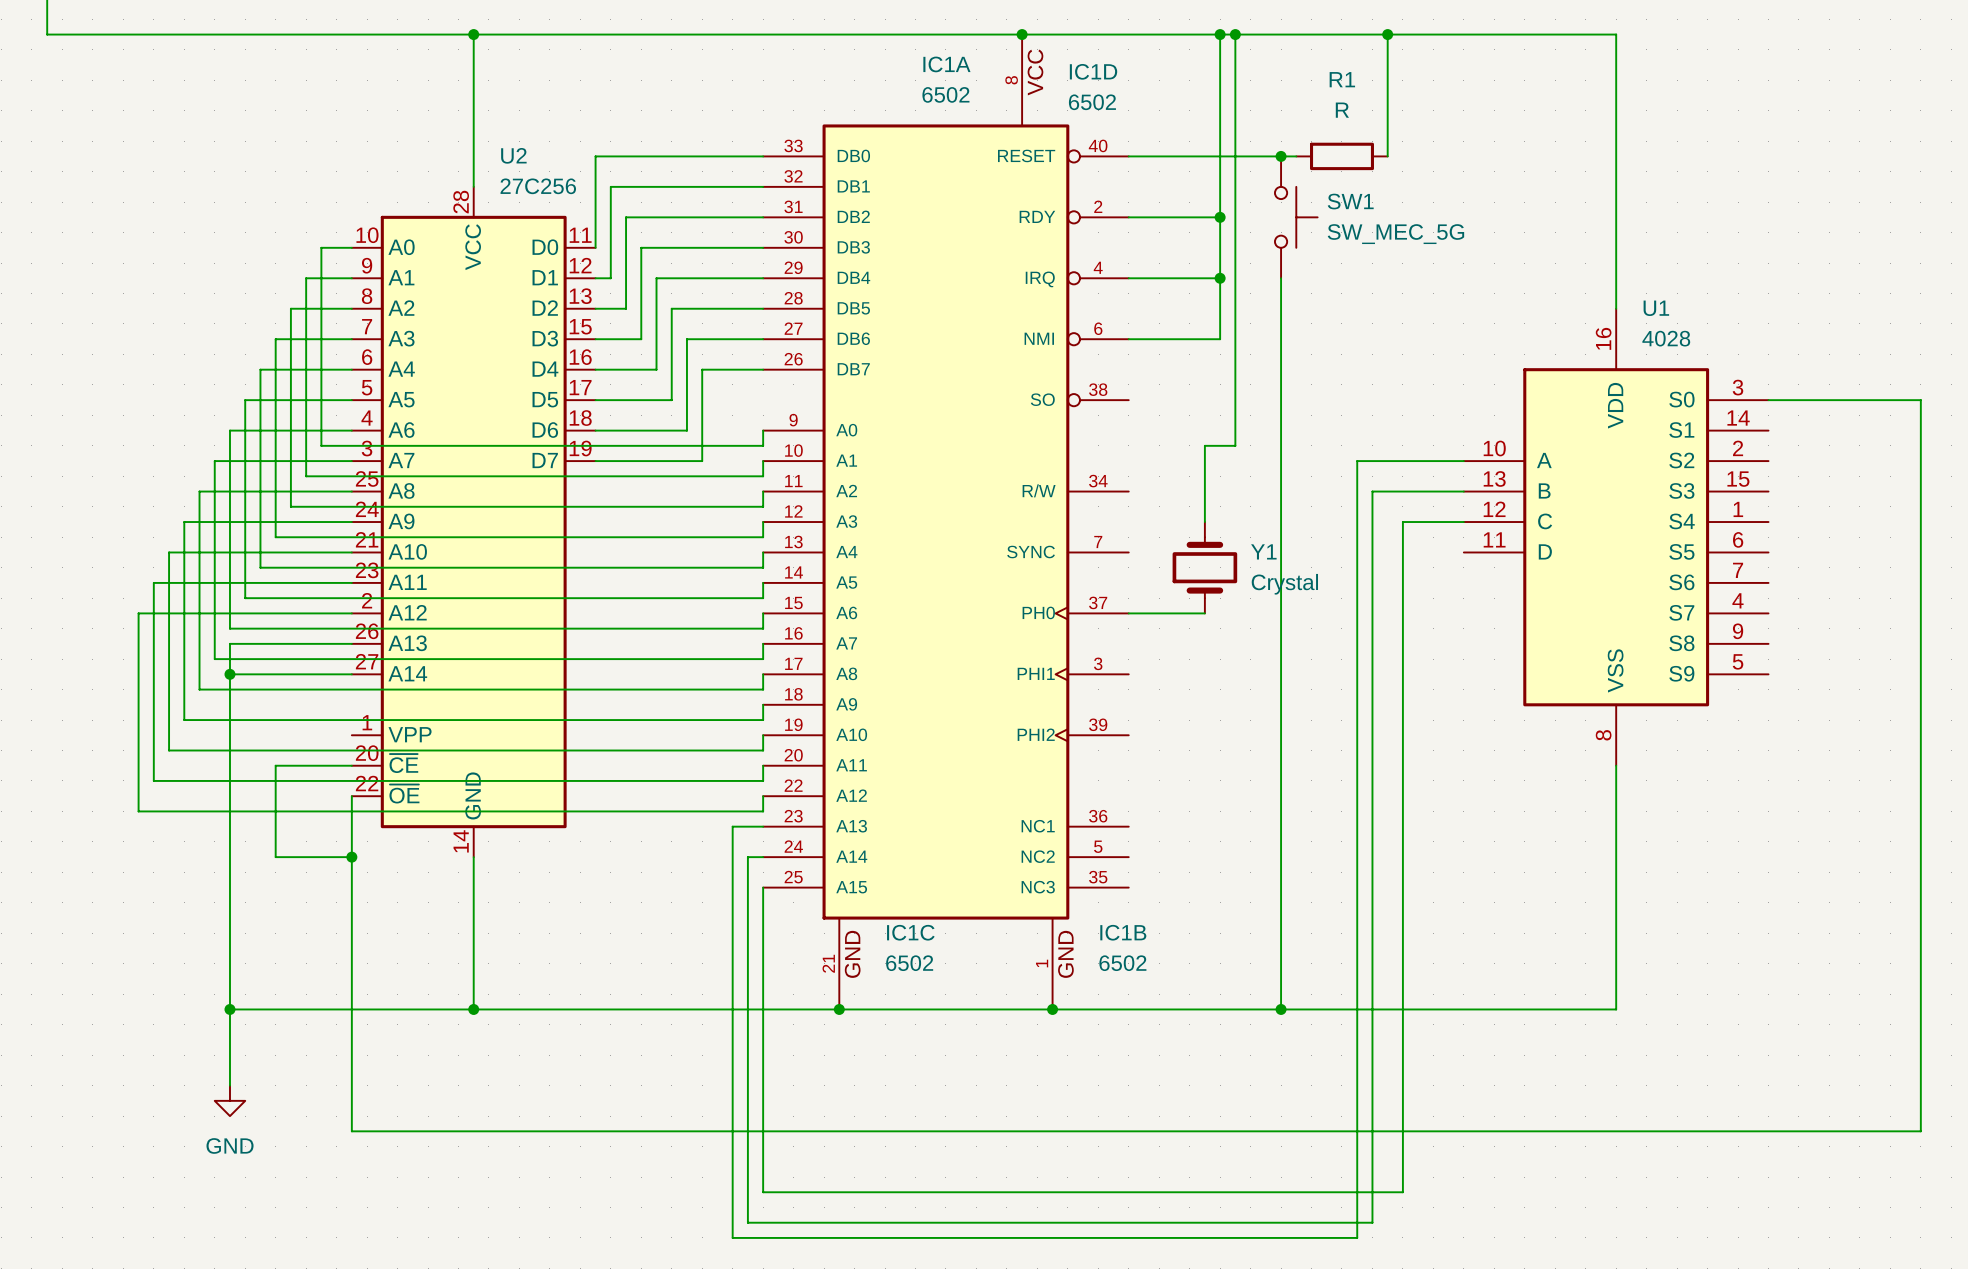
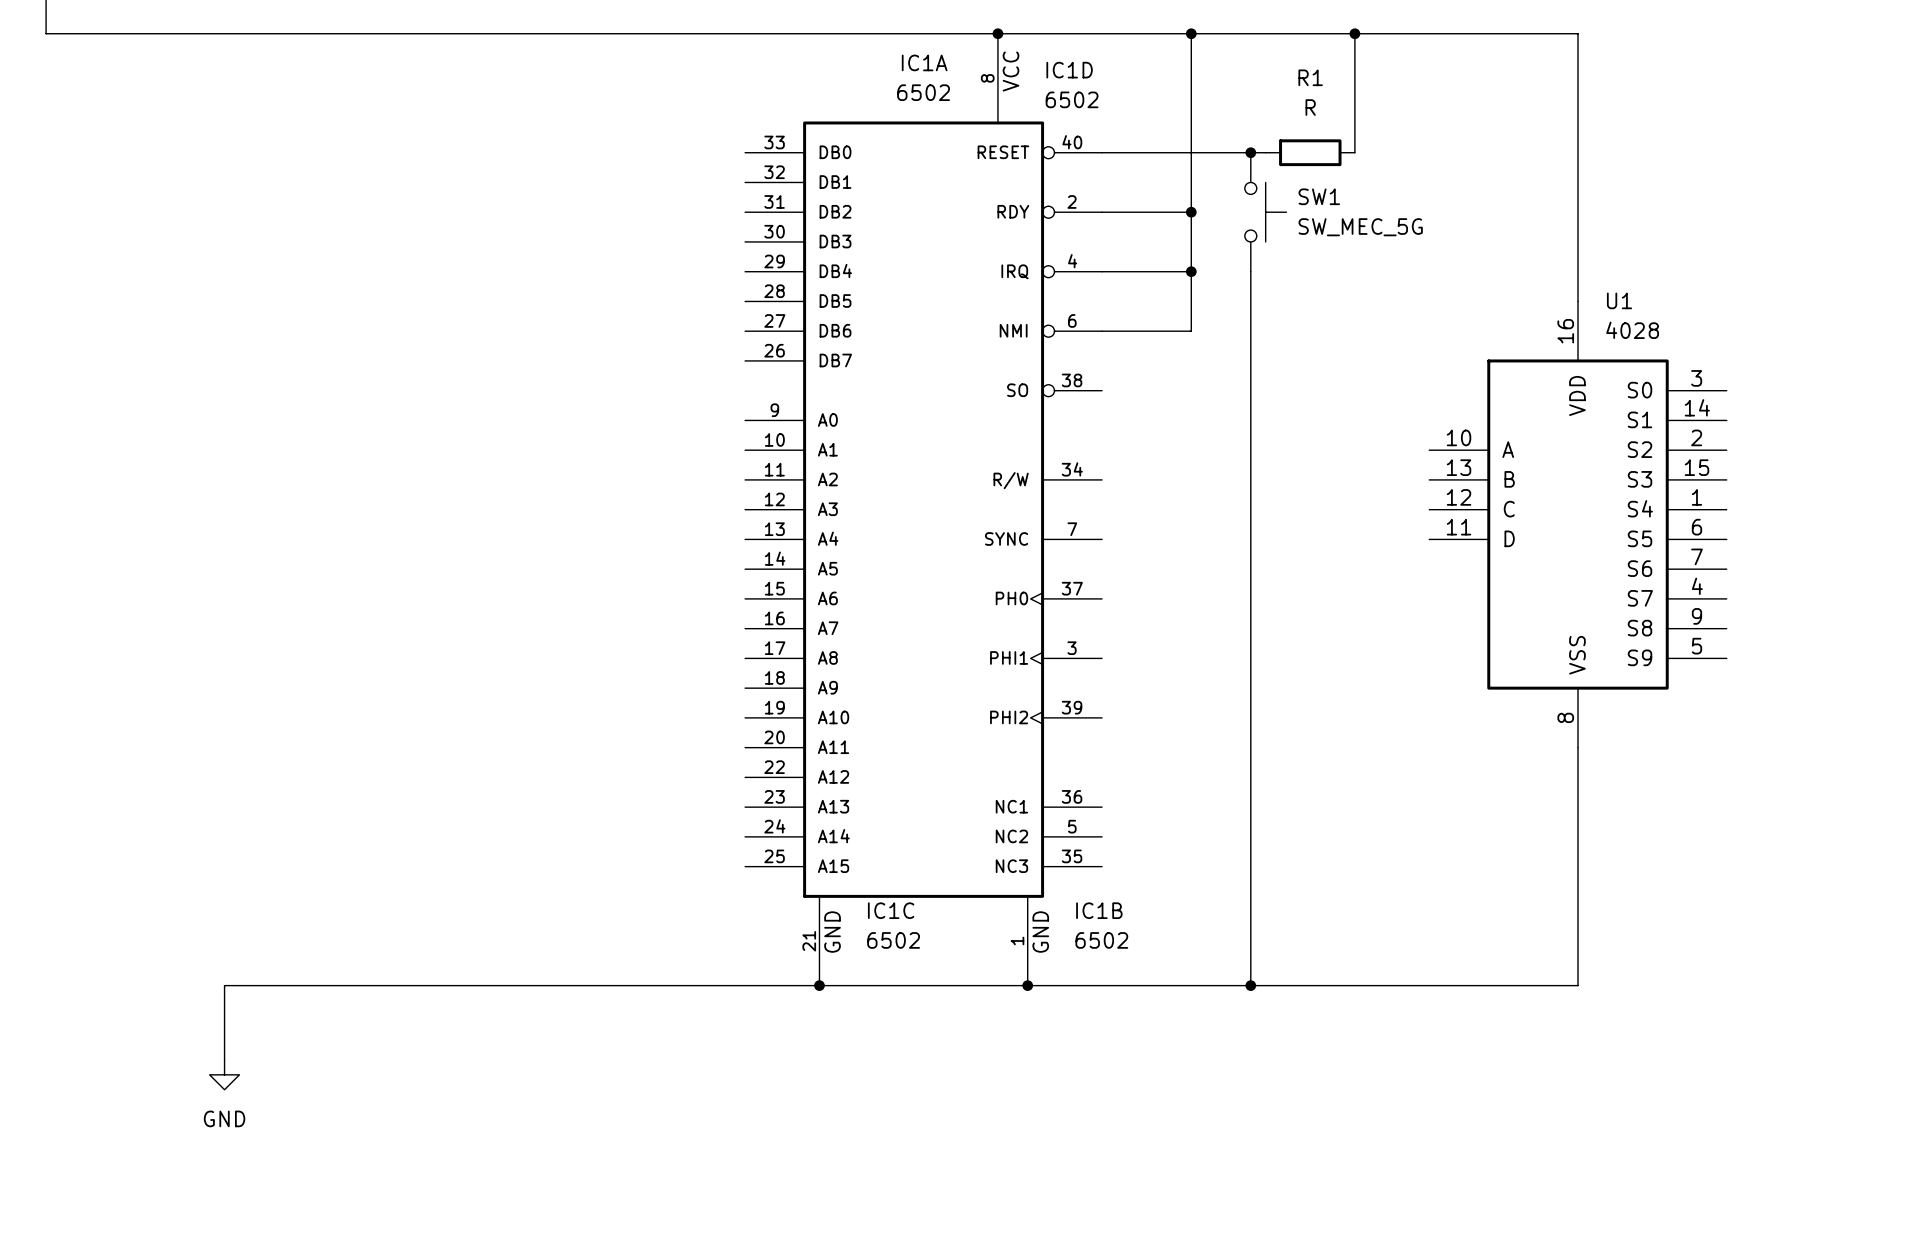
wire: (473, 34) (473, 186) -> none
junction: (473, 34) -> none
wire: (1235, 34) (1235, 445) (1204, 445) (1204, 522) -> none
junction: (1235, 34) -> none
wire: (763, 156) (595, 156) (595, 247) -> none
wire: (763, 186) (610, 186) (610, 278) (595, 278) -> none
wire: (763, 217) (626, 217) (626, 308) (595, 308) -> none
wire: (351, 247) (321, 247) (321, 445) (763, 445) (763, 430) -> none
wire: (763, 247) (641, 247) (641, 339) (595, 339) -> none
wire: (351, 278) (306, 278) (306, 476) (763, 476) (763, 461) -> none
wire: (763, 278) (656, 278) (656, 369) (595, 369) -> none
wire: (351, 308) (290, 308) (290, 506) (763, 506) (763, 491) -> none
wire: (763, 308) (671, 308) (671, 400) (595, 400) -> none
wire: (351, 339) (275, 339) (275, 537) (763, 537) (763, 522) -> none
wire: (763, 339) (686, 339) (686, 430) (595, 430) -> none
wire: (351, 369) (260, 369) (260, 567) (763, 567) (763, 552) -> none
wire: (763, 369) (702, 369) (702, 461) (595, 461) -> none
wire: (351, 400) (245, 400) (245, 598) (763, 598) (763, 582) -> none
wire: (1768, 400) (1920, 400) (1920, 1131) (351, 1131) (351, 796) -> none
wire: (351, 430) (229, 430) (229, 628) (763, 628) (763, 613) -> none
wire: (351, 461) (214, 461) (214, 659) (763, 659) (763, 643) -> none
wire: (1463, 461) (1357, 461) (1357, 1237) (732, 1237) (732, 826) (763, 826) -> none
wire: (351, 491) (199, 491) (199, 689) (763, 689) (763, 674) -> none
wire: (1463, 491) (1372, 491) (1372, 1222) (747, 1222) (747, 857) (763, 857) -> none
wire: (351, 522) (184, 522) (184, 720) (763, 720) (763, 704) -> none
U2: 27C256 (473, 522) -> none
wire: (1463, 522) (1402, 522) (1402, 1192) (763, 1192) (763, 887) -> none
wire: (351, 552) (169, 552) (169, 750) (763, 750) (763, 735) -> none
Y1: Crystal (1204, 567) -> none
wire: (351, 582) (153, 582) (153, 780) (763, 780) (763, 765) -> none
wire: (351, 613) (138, 613) (138, 811) (763, 811) (763, 796) -> none
wire: (1128, 613) (1204, 613) -> none
wire: (351, 643) (229, 643) (229, 1009) -> none
wire: (229, 674) (351, 674) -> none
junction: (229, 674) -> none
wire: (351, 765) (275, 765) (275, 857) (351, 857) -> none
junction: (351, 857) -> none
wire: (473, 857) (473, 1009) -> none
junction: (229, 1009) -> none
junction: (473, 1009) -> none

